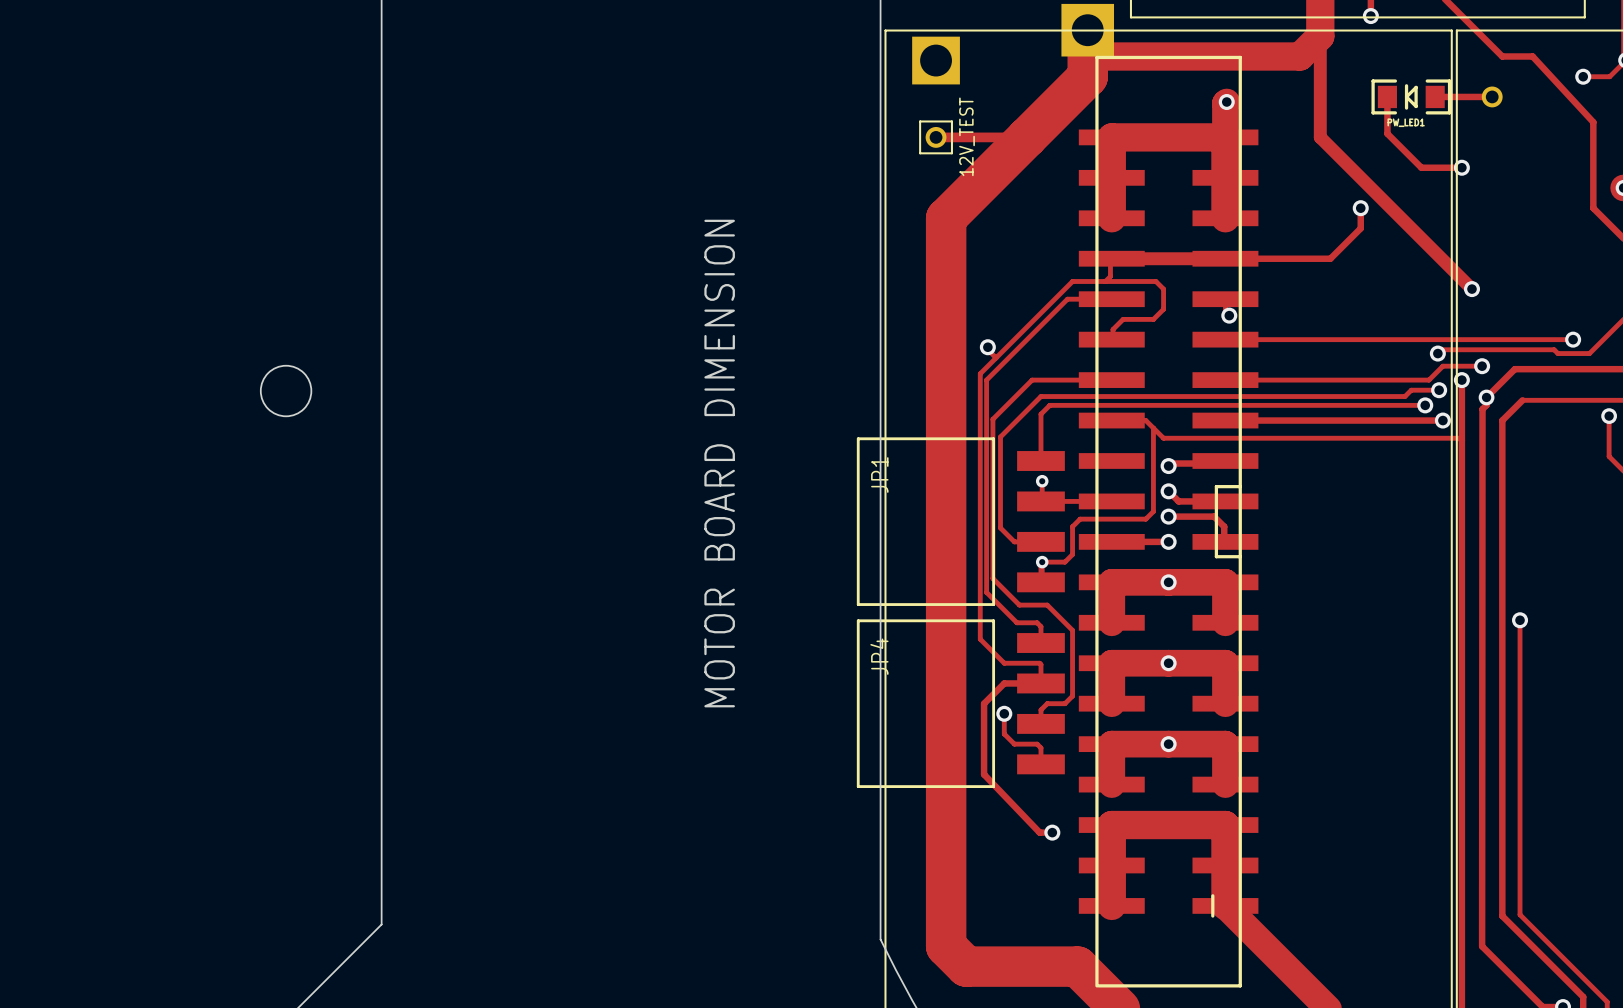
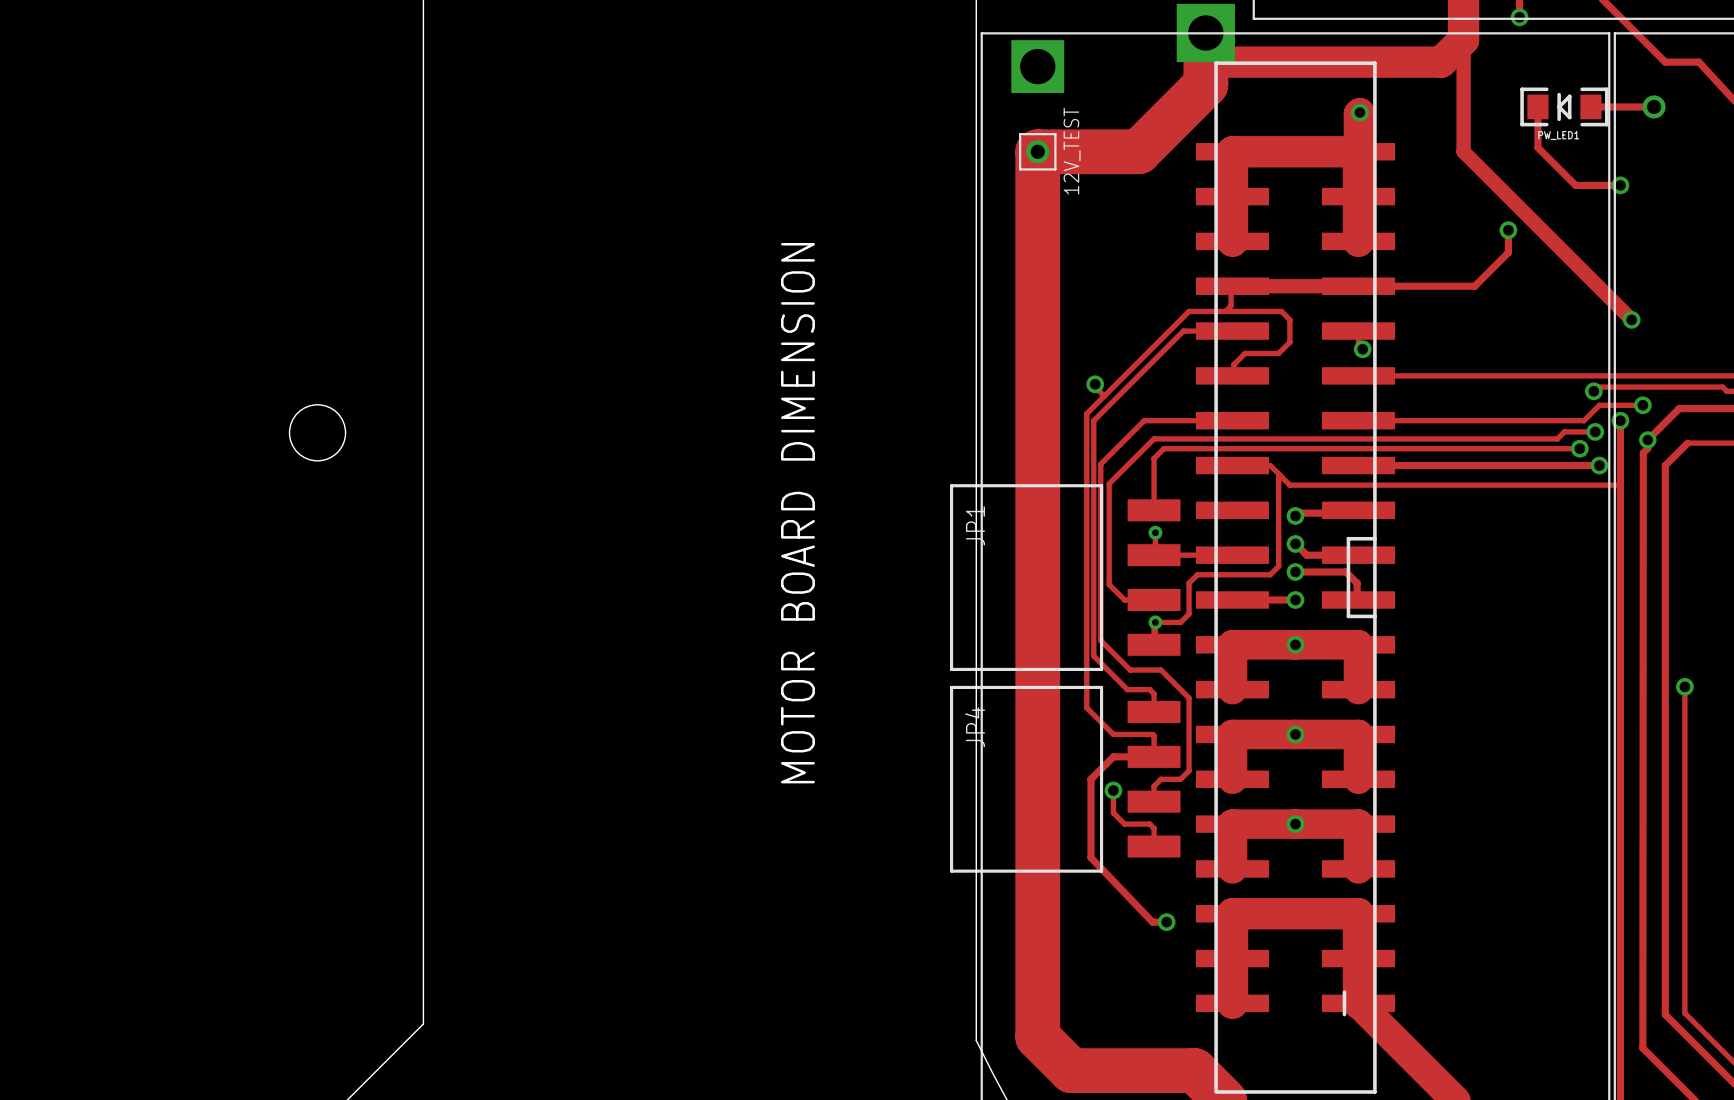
track width: thin (936, 137) (1027, 137) -> thick (1037, 151) (1138, 151)
track: (1027, 137) (946, 218) (946, 946) -> (1037, 151) (1037, 1037) (1048, 1048)

